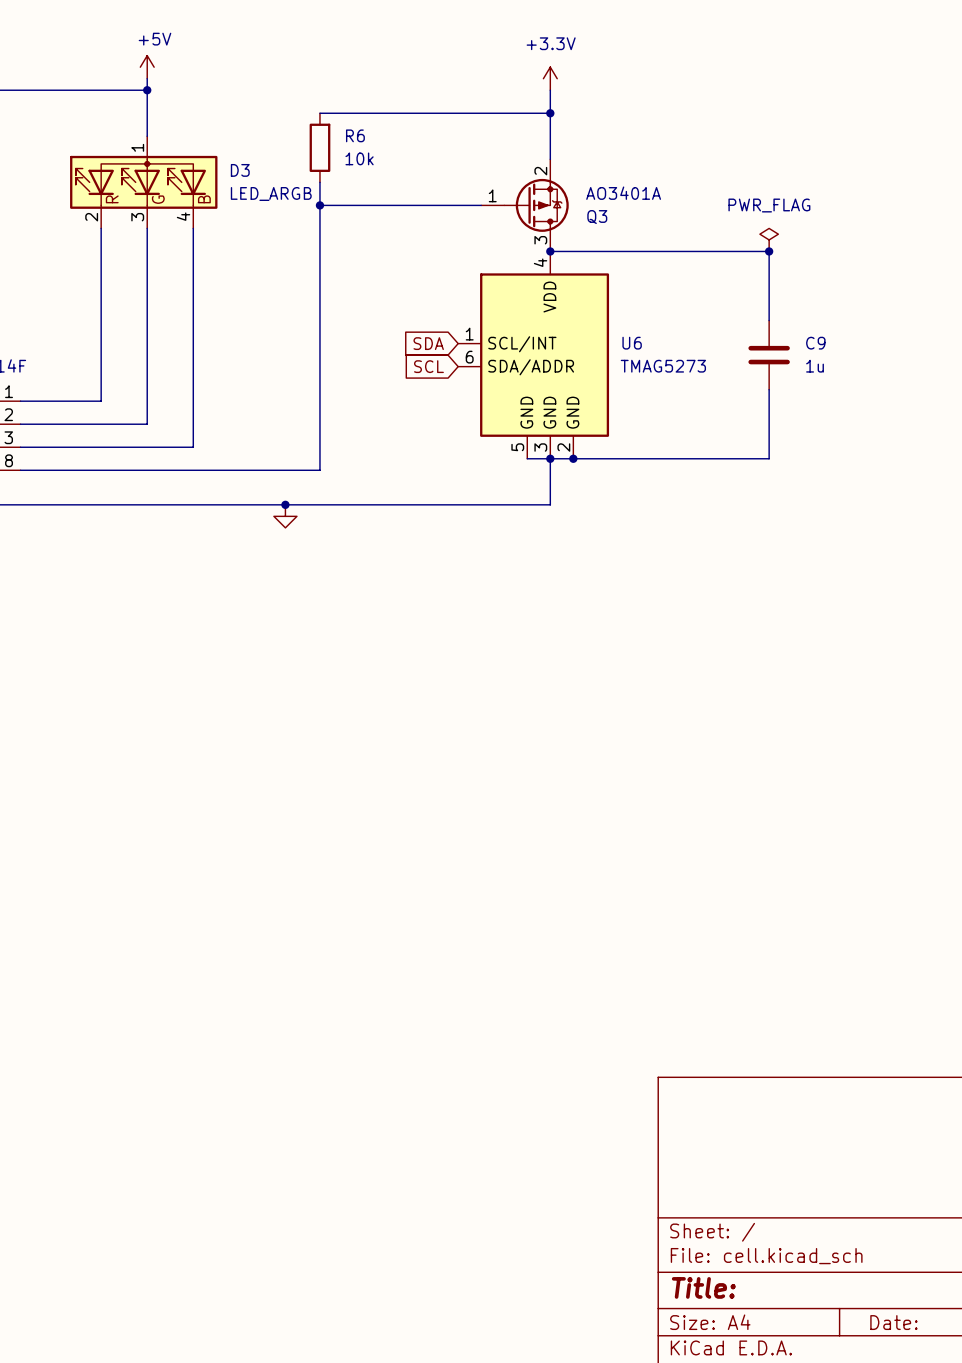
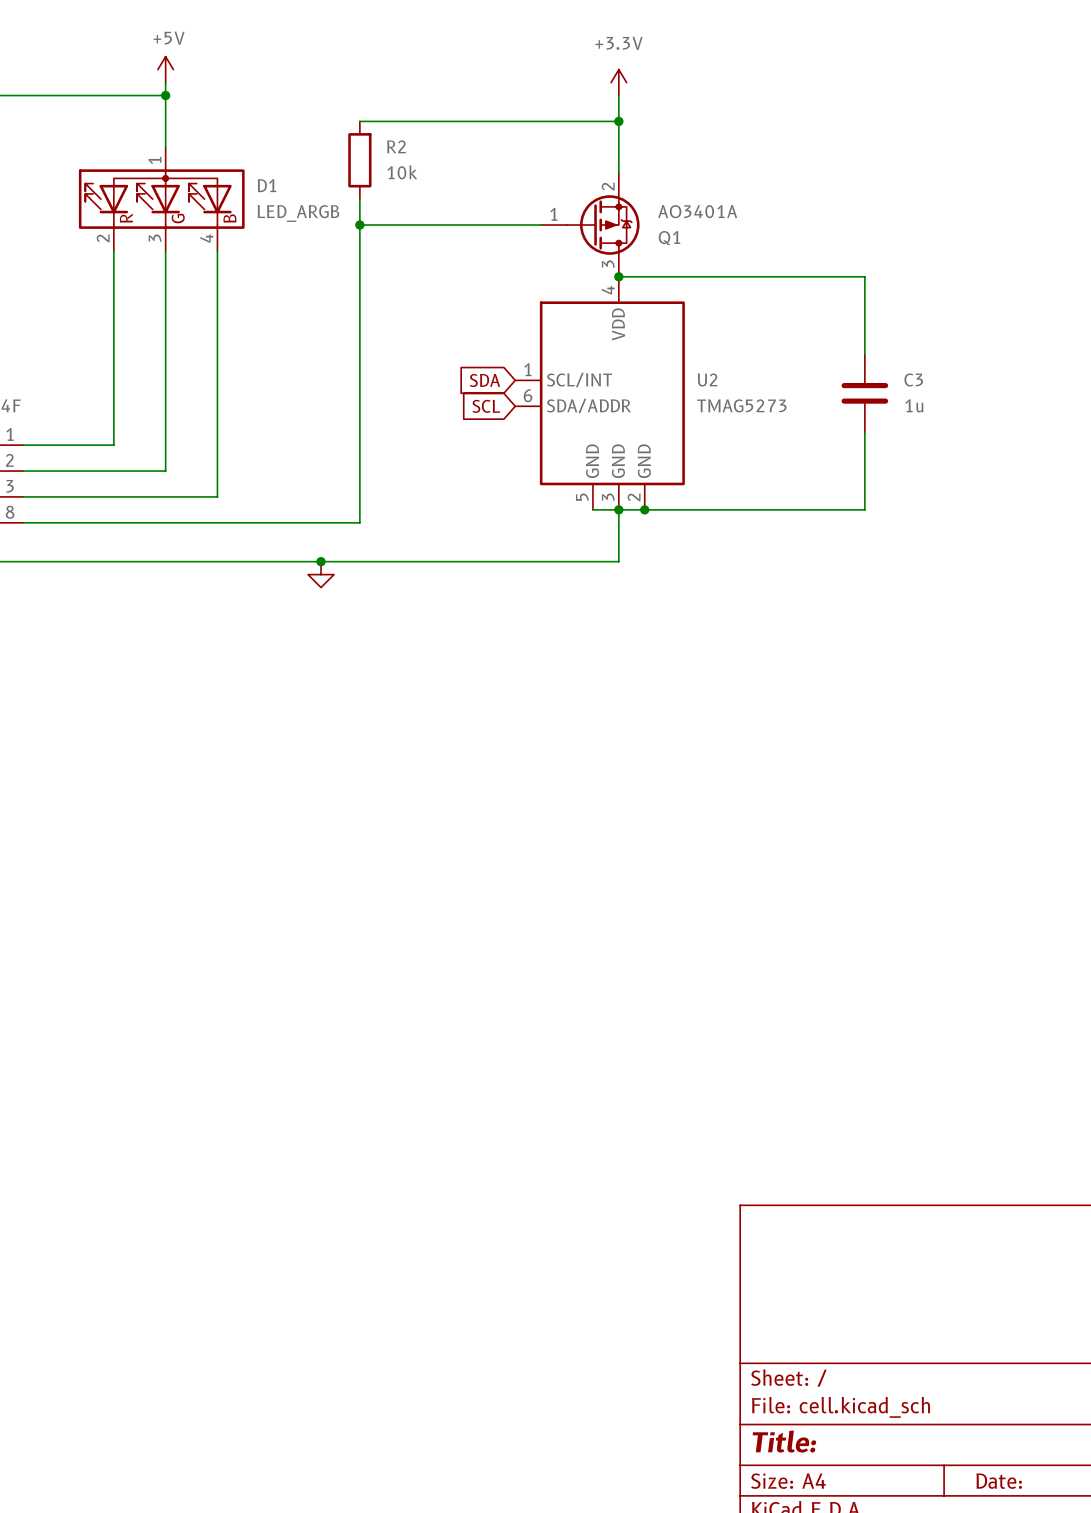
R6 name: R6 (355, 135) -> R2 (396, 146)
D3 name: D3 (240, 170) -> D1 (267, 185)
Q3 name: Q3 (597, 217) -> Q1 (669, 238)
power symbol: PWR_FLAG (769, 239) -> none
junction: (769, 251) -> none
U6 name: U6 (632, 343) -> U2 (707, 379)
C9 name: C9 (815, 343) -> C3 (913, 379)

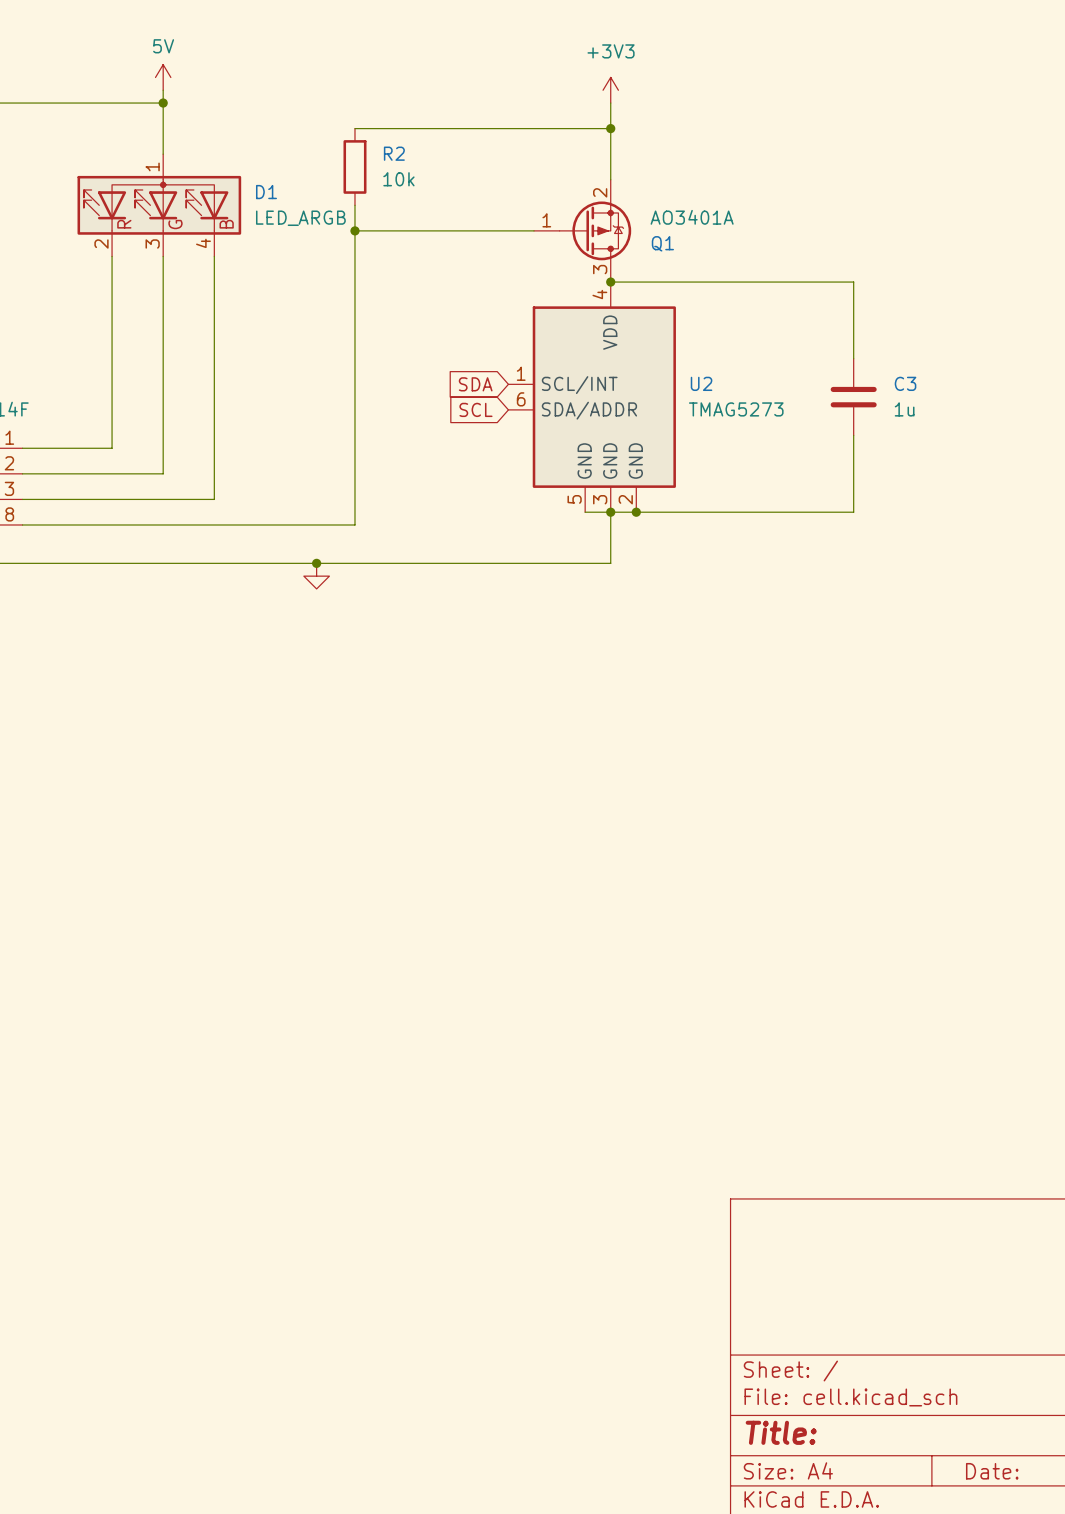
power symbol: +5V (165, 69) -> 5V (163, 77)
power symbol: +3.3V (618, 82) -> +3V3 (610, 90)

